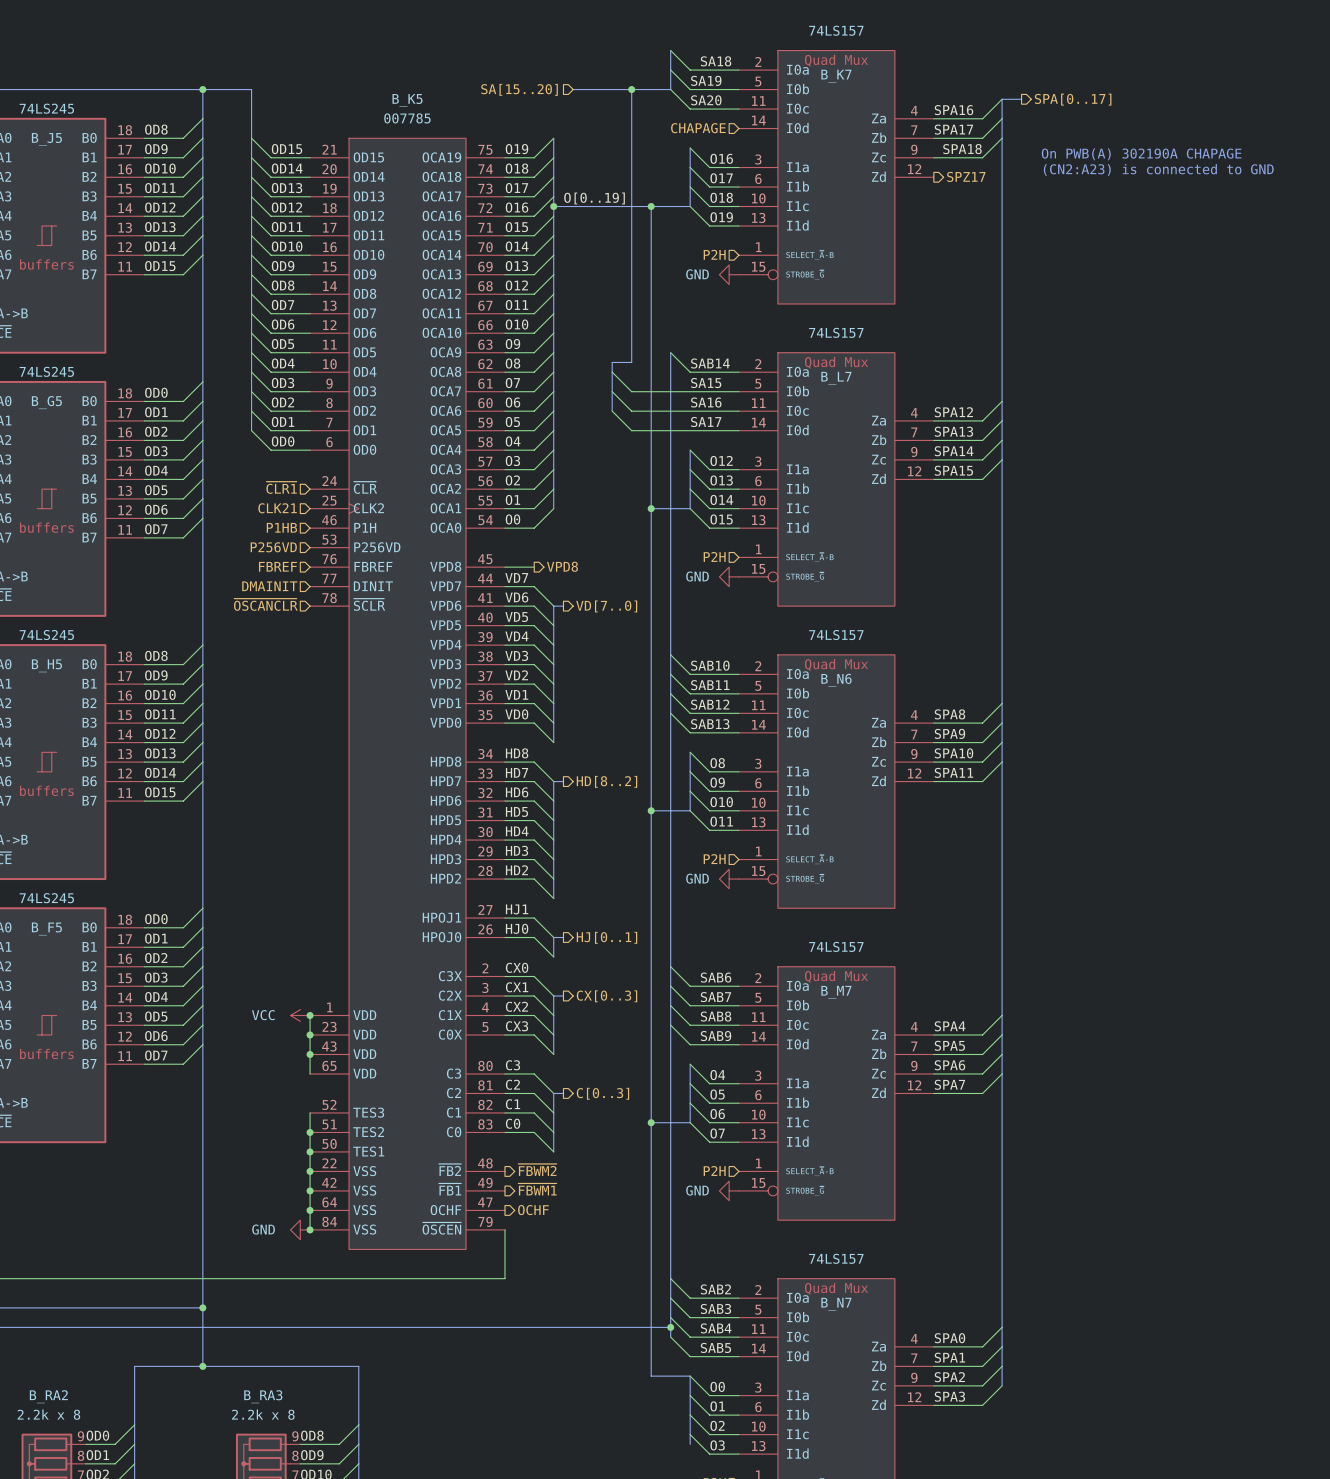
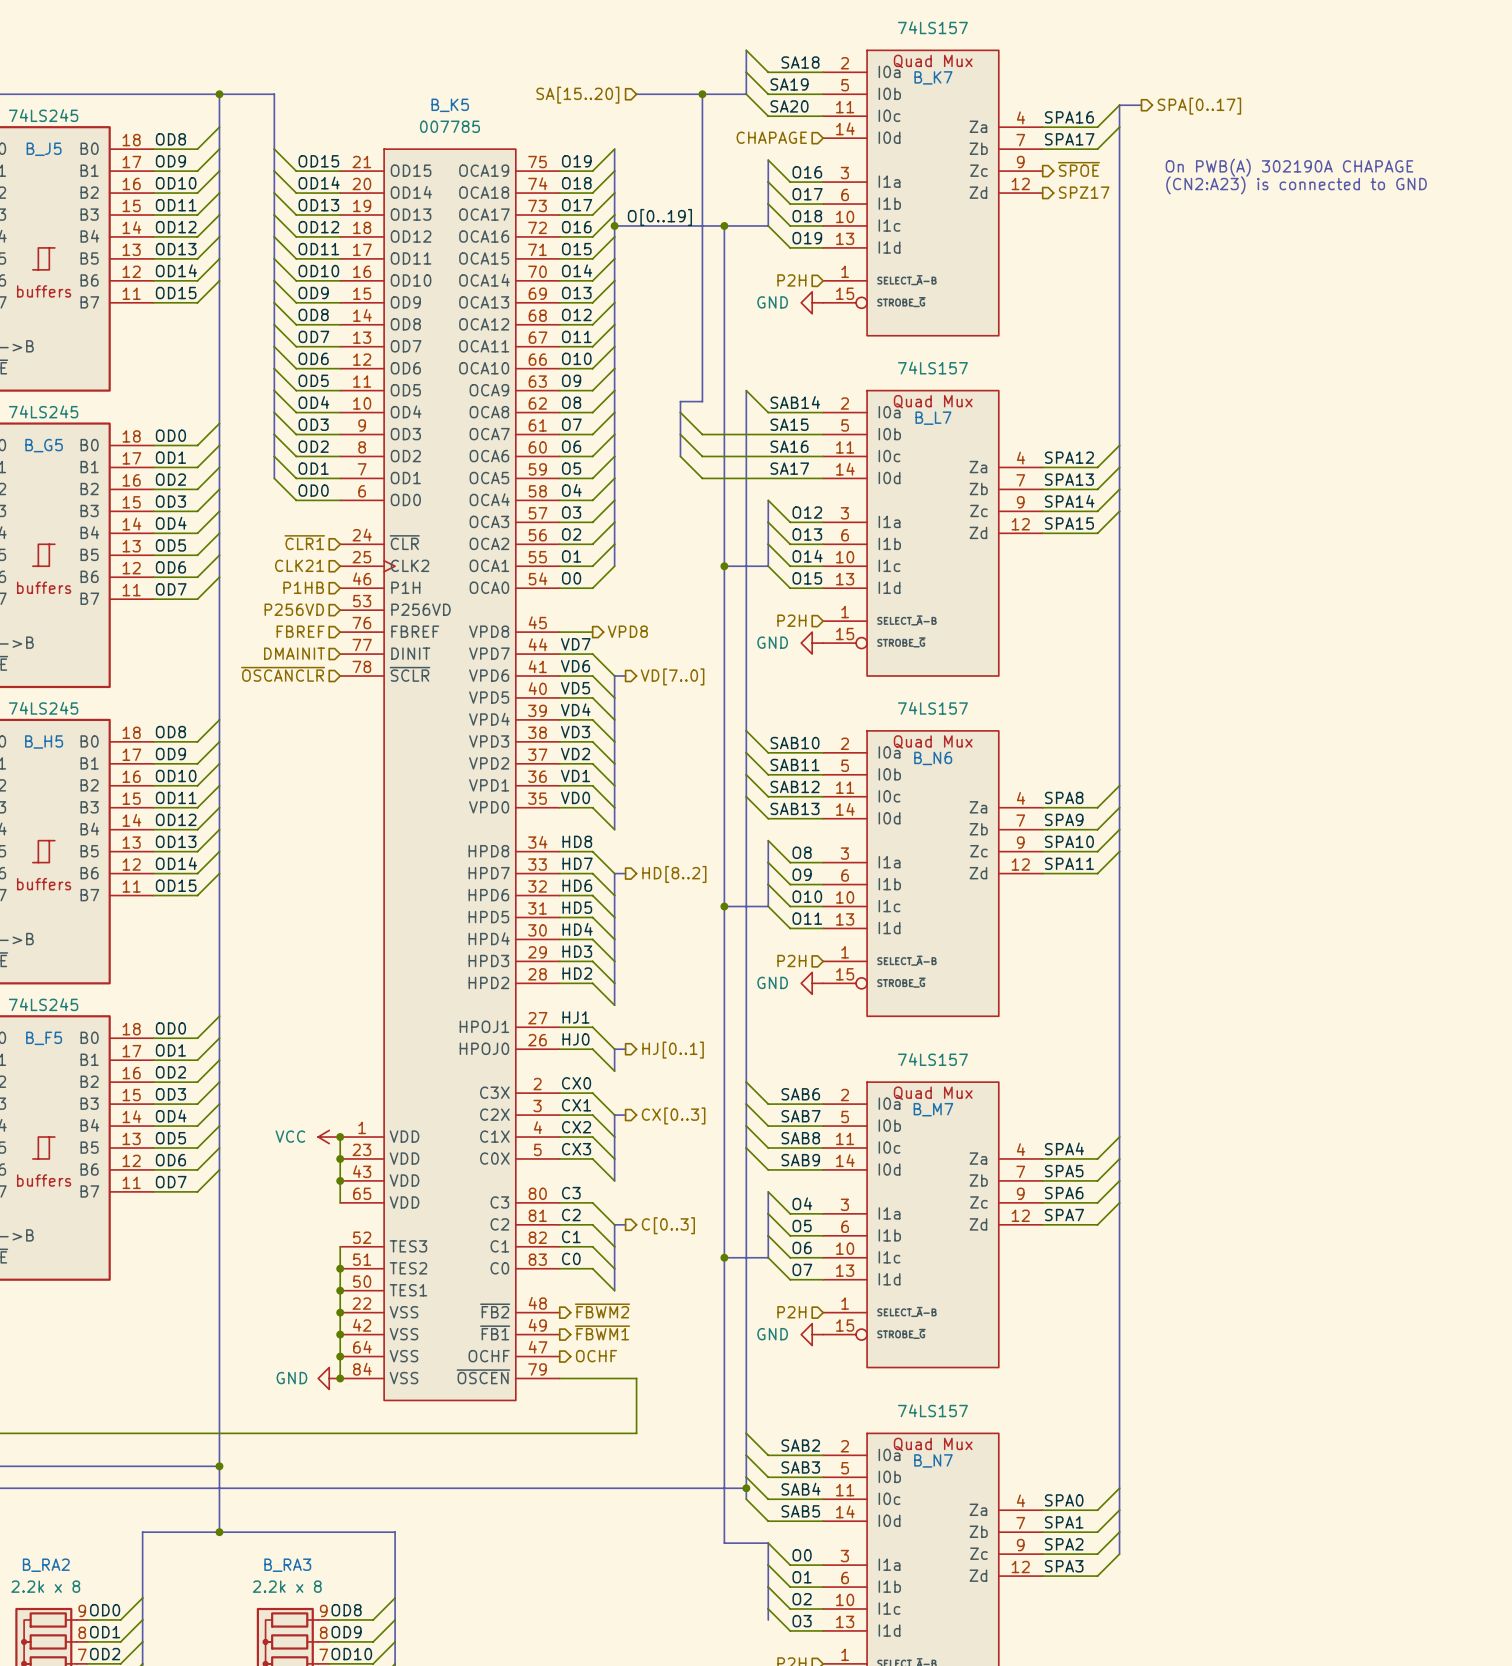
wire: (1002, 138) (982, 157) (933, 157) -> none
label: SPA18 (962, 149) -> none
hierarchical label: none -> ~{SPOE} (1078, 169)
wire: (504, 1229) (504, 1278) -> (559, 1378) (636, 1378) (636, 1433) (559, 1433)

